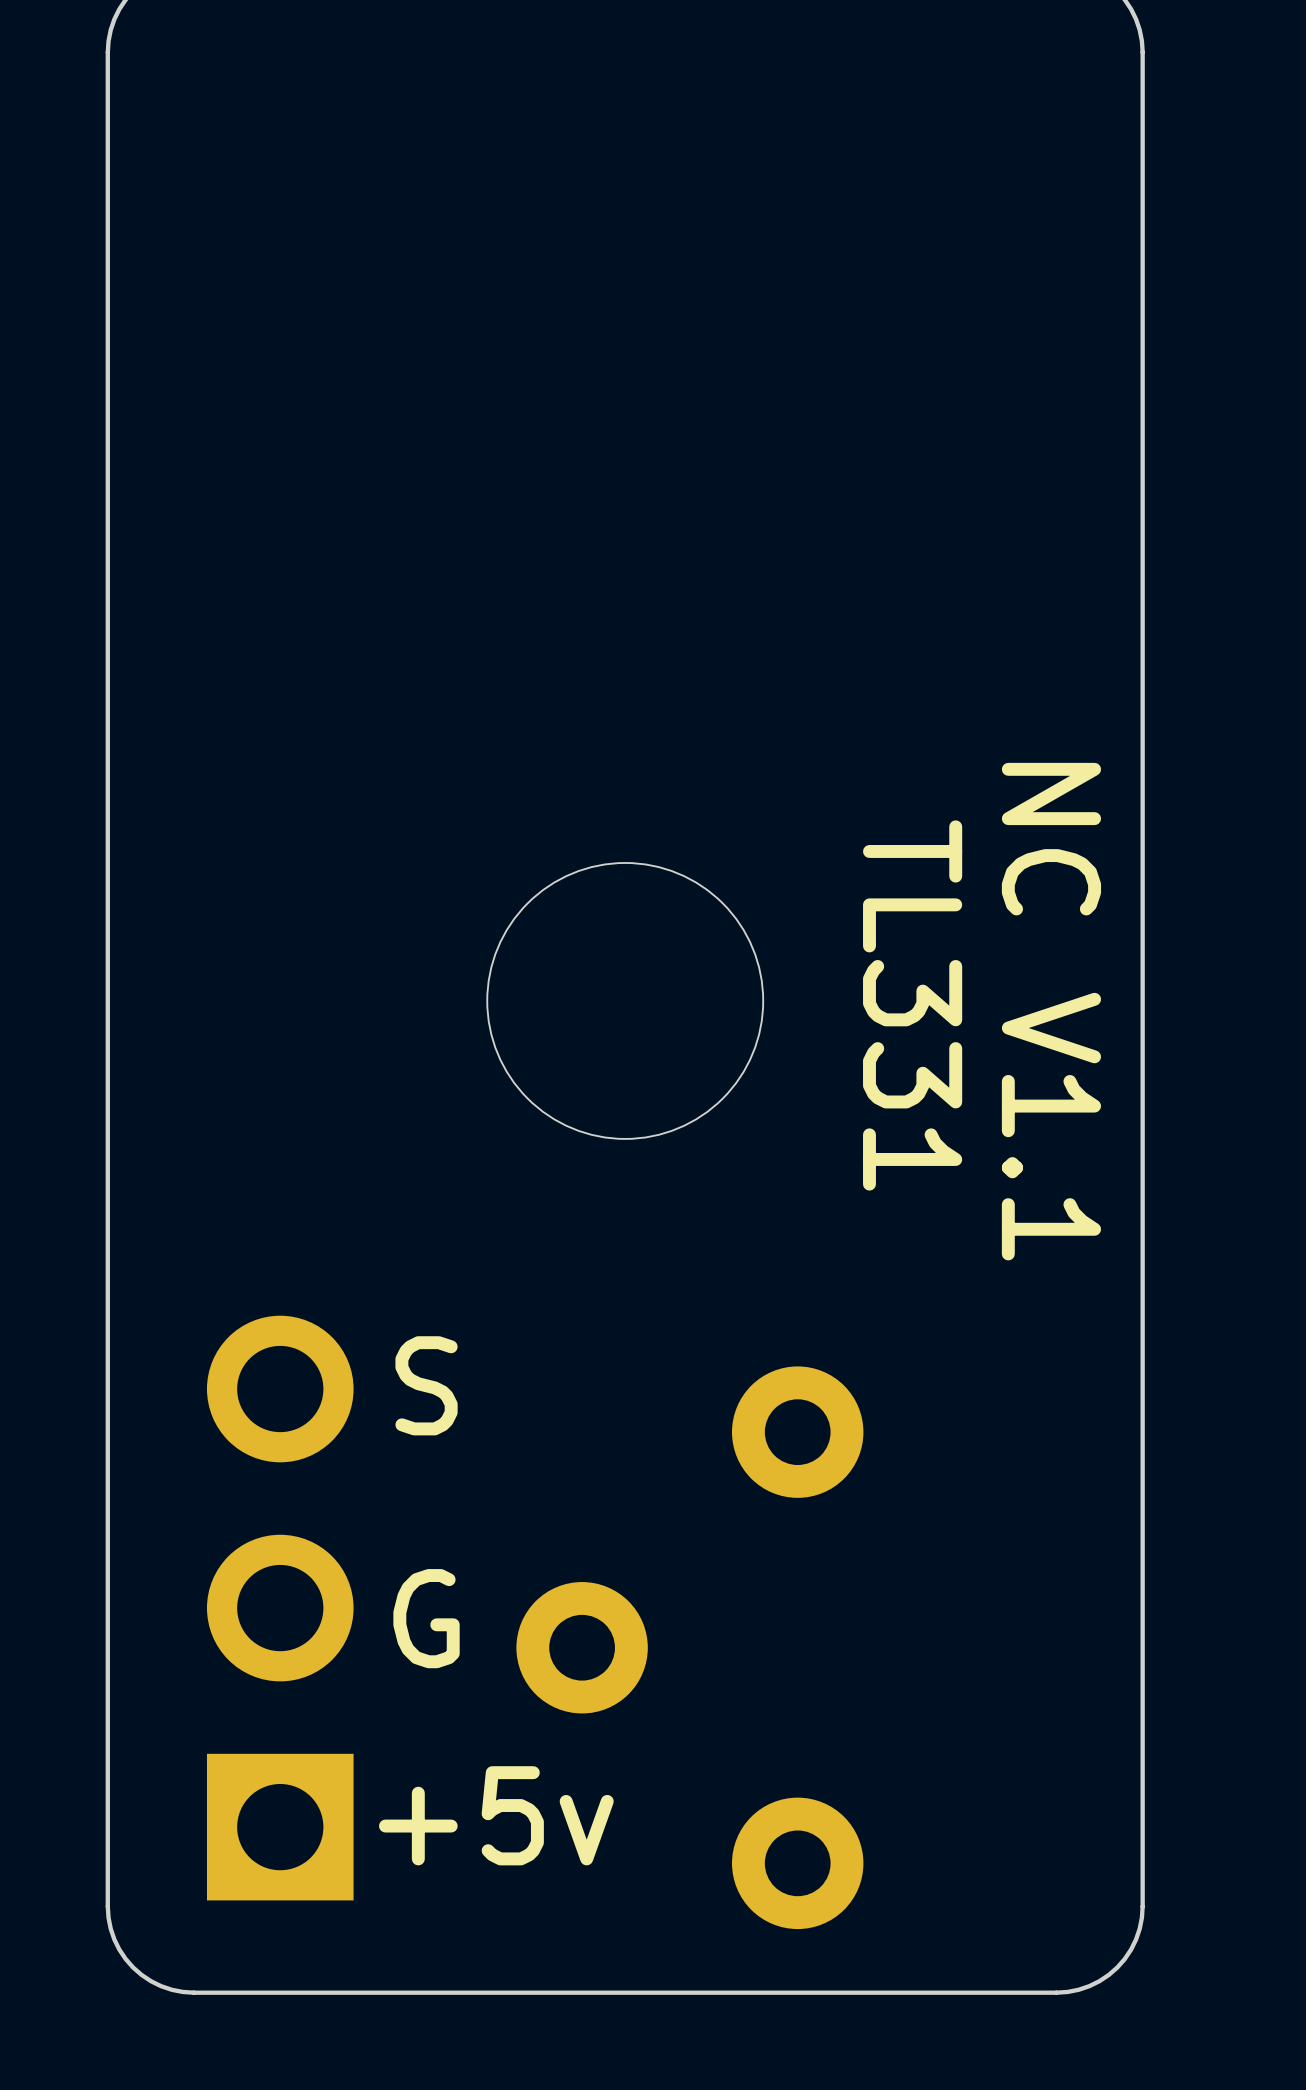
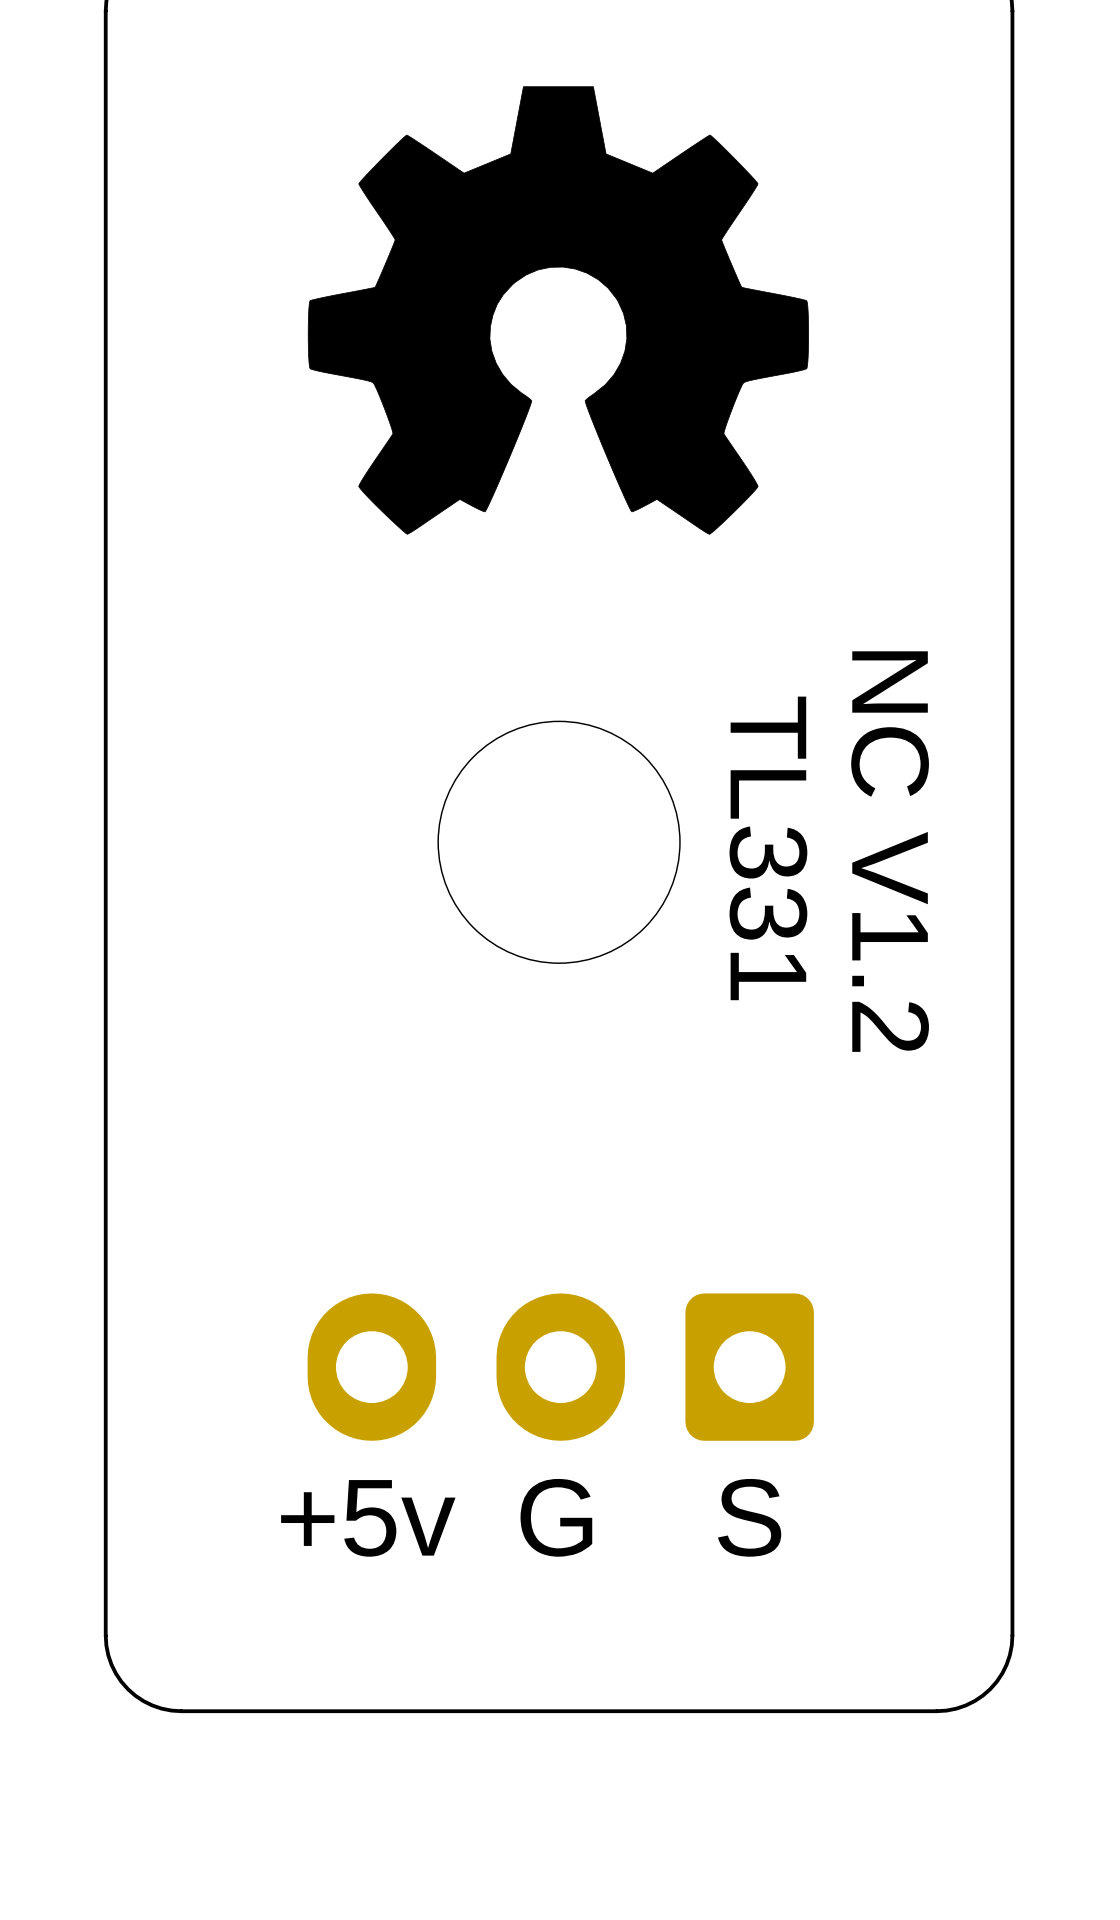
drawing: none -> [307, 86, 809, 535]
text position: TL331 (912, 1005) -> TL331 (768, 848)
text: NC V1.1 (1051, 1011) -> NC V1.2 (890, 851)
part footprint: [516, 1366, 864, 1930] -> [307, 1293, 814, 1441]
text position: S (426, 1385) -> S (749, 1517)
part: (280, 1608) -> none
text position: G (426, 1618) -> G (556, 1517)
text position: +5v (496, 1815) -> +5v (368, 1518)

